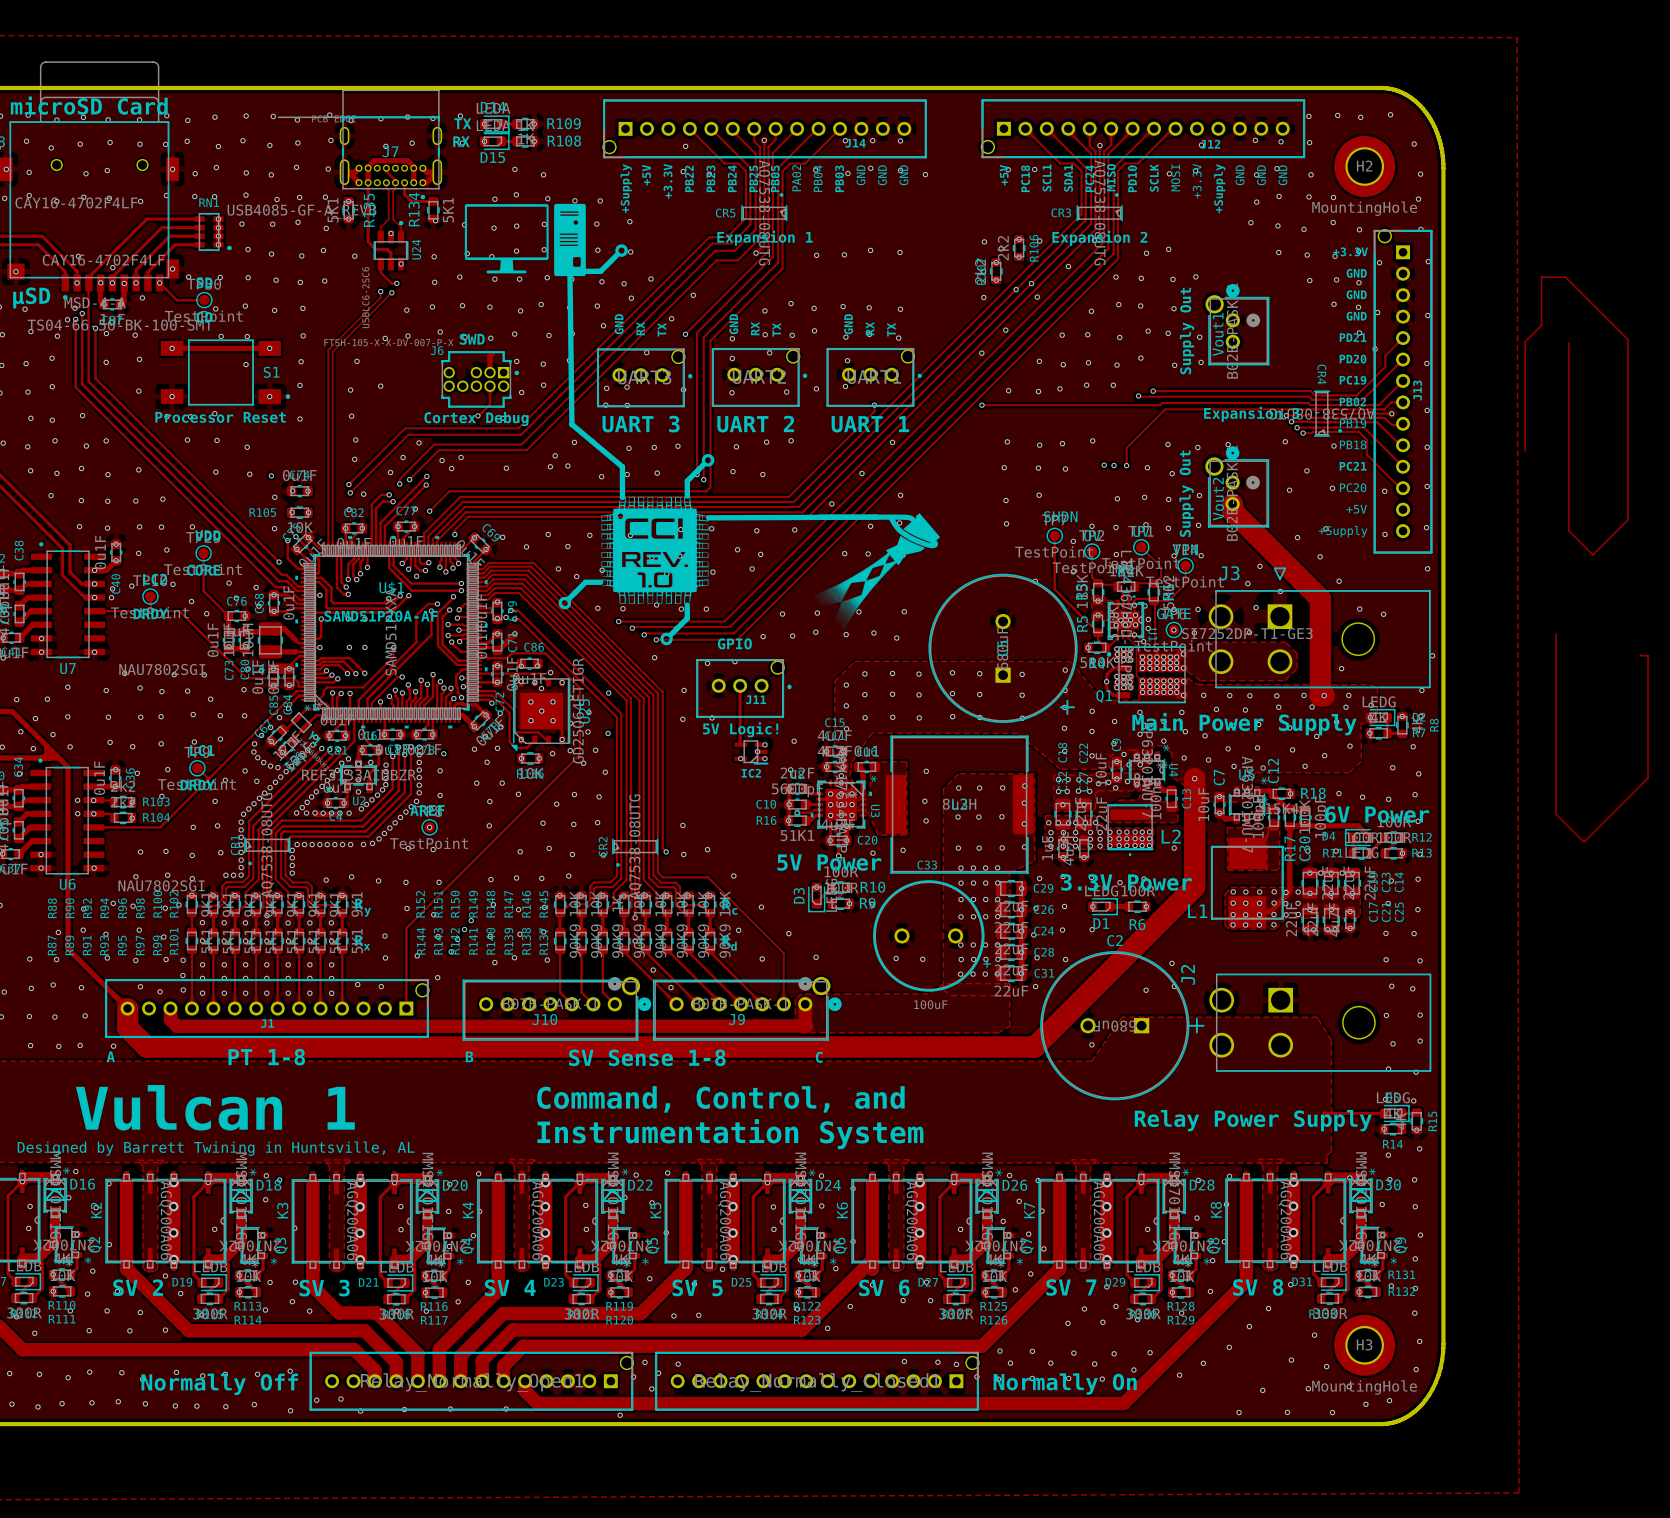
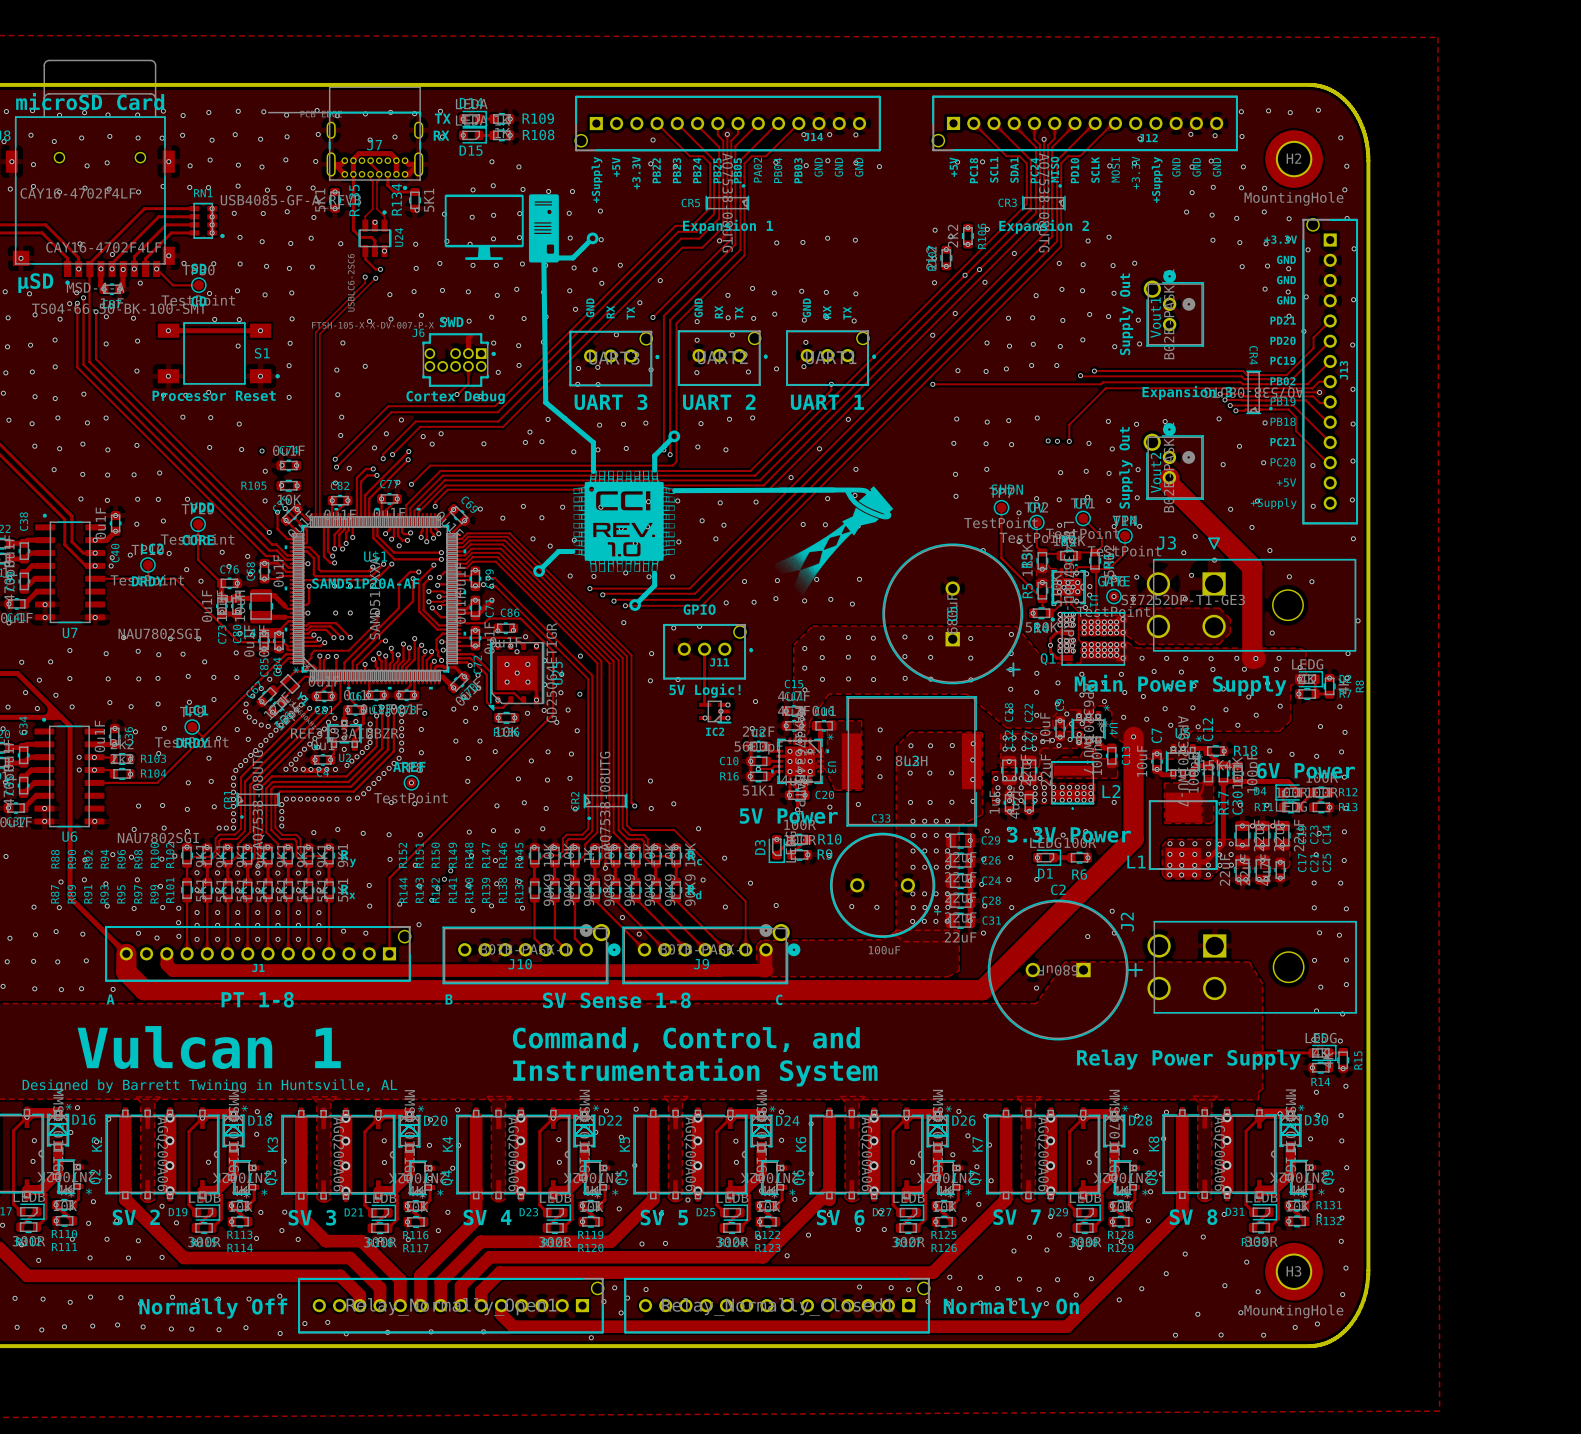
track: (1568, 342) (1568, 530) (1592, 554) (1627, 519) (1627, 339) (1565, 277) (1541, 277) (1541, 325) (1525, 341) (1525, 450) -> none
track: (1556, 633) (1556, 814) (1583, 841) (1648, 778) (1648, 655) (1640, 654) -> none

